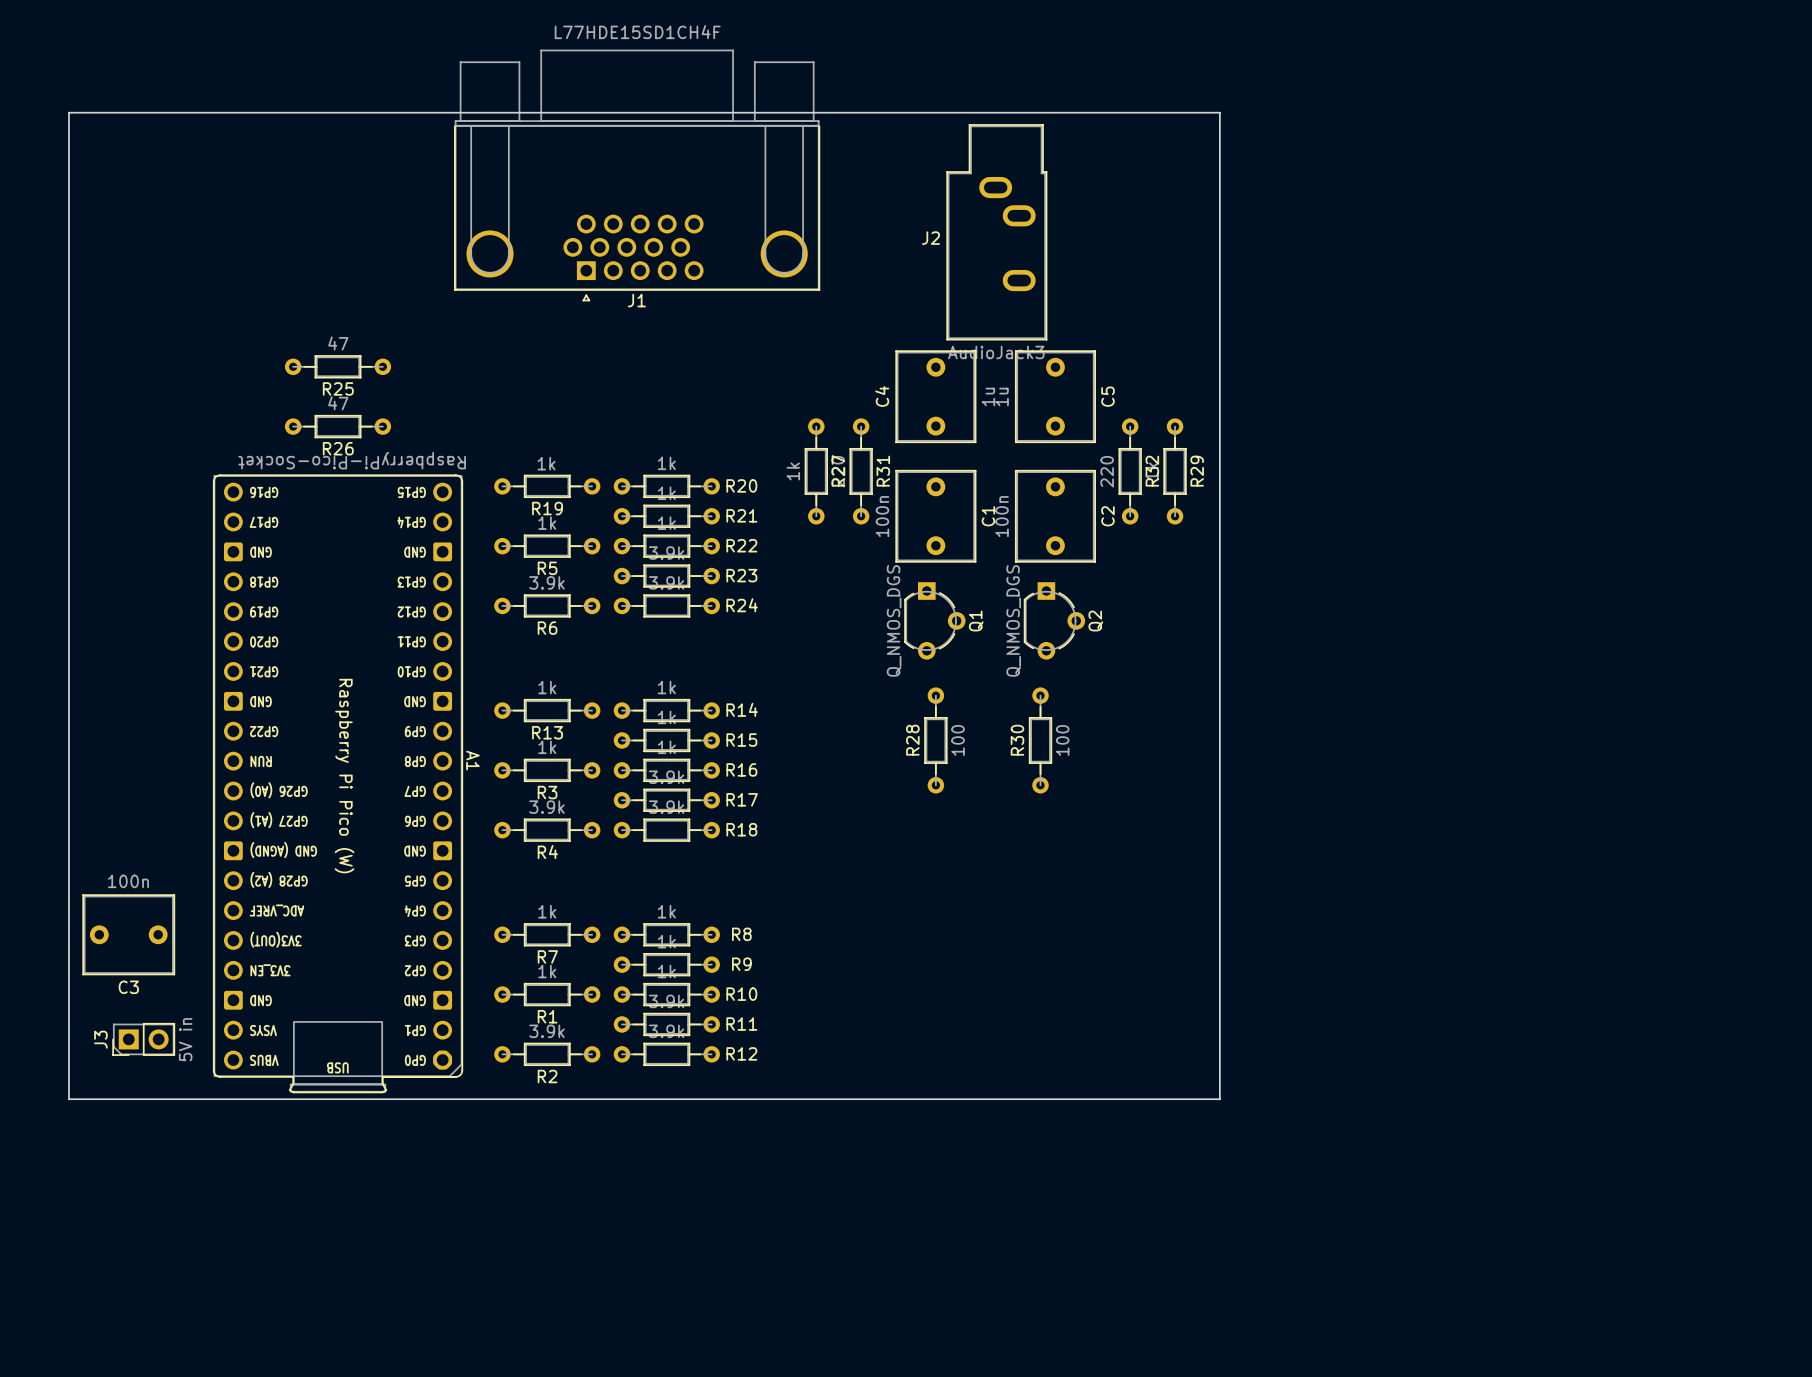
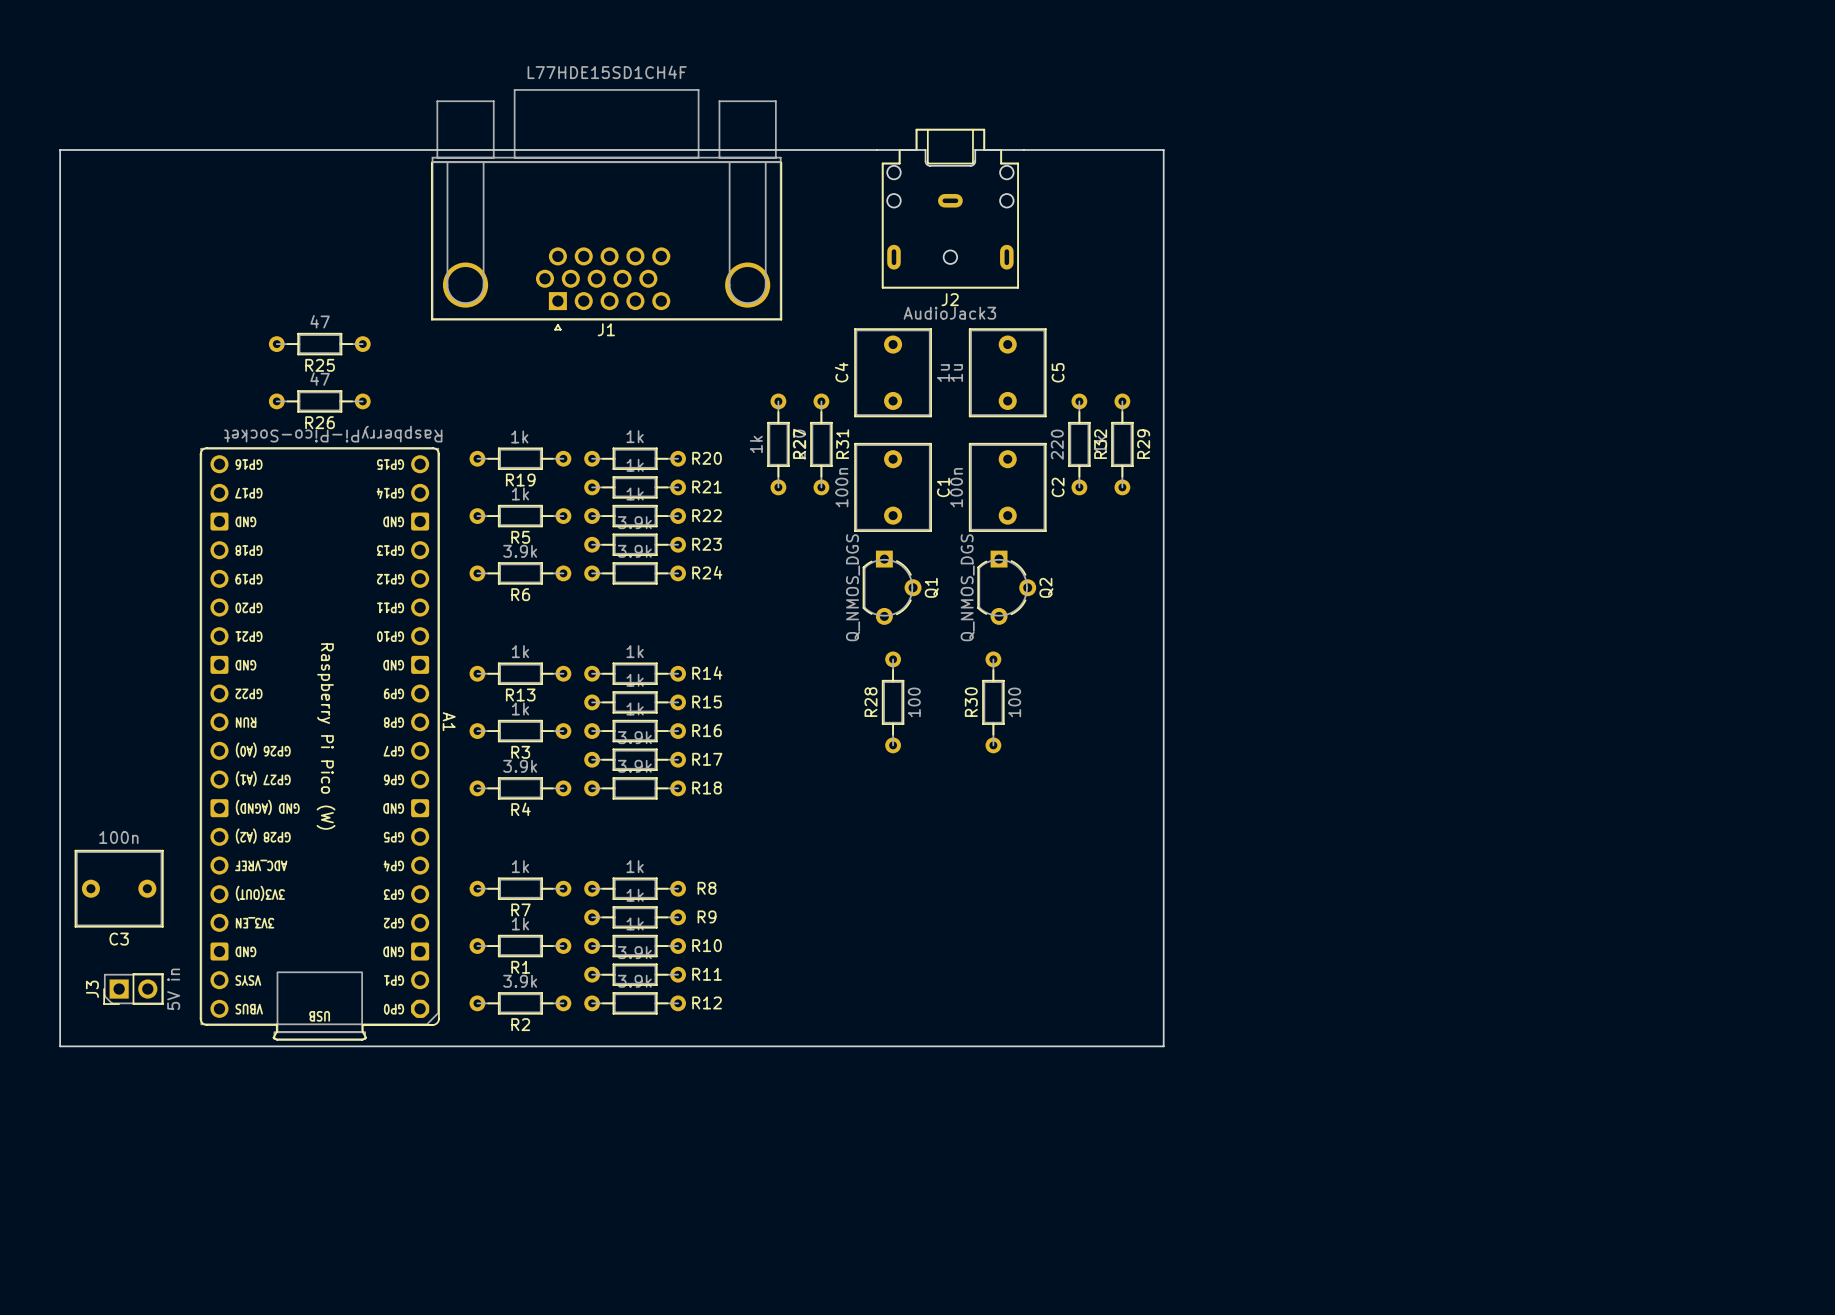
J2 footprint: [946, 124, 1048, 341] -> [876, 129, 1025, 289]
board edge: none -> (1023, 149) (1163, 149) (1163, 1046)
J1 position: (637, 175) -> (606, 209)
J2 name position: J2 (930, 238) -> J2 (950, 299)
board edge: (68, 1099) (68, 112) (1219, 112) (1219, 1099) (1218, 1099) -> (61, 1046) (60, 1046) (60, 149) (877, 149)

